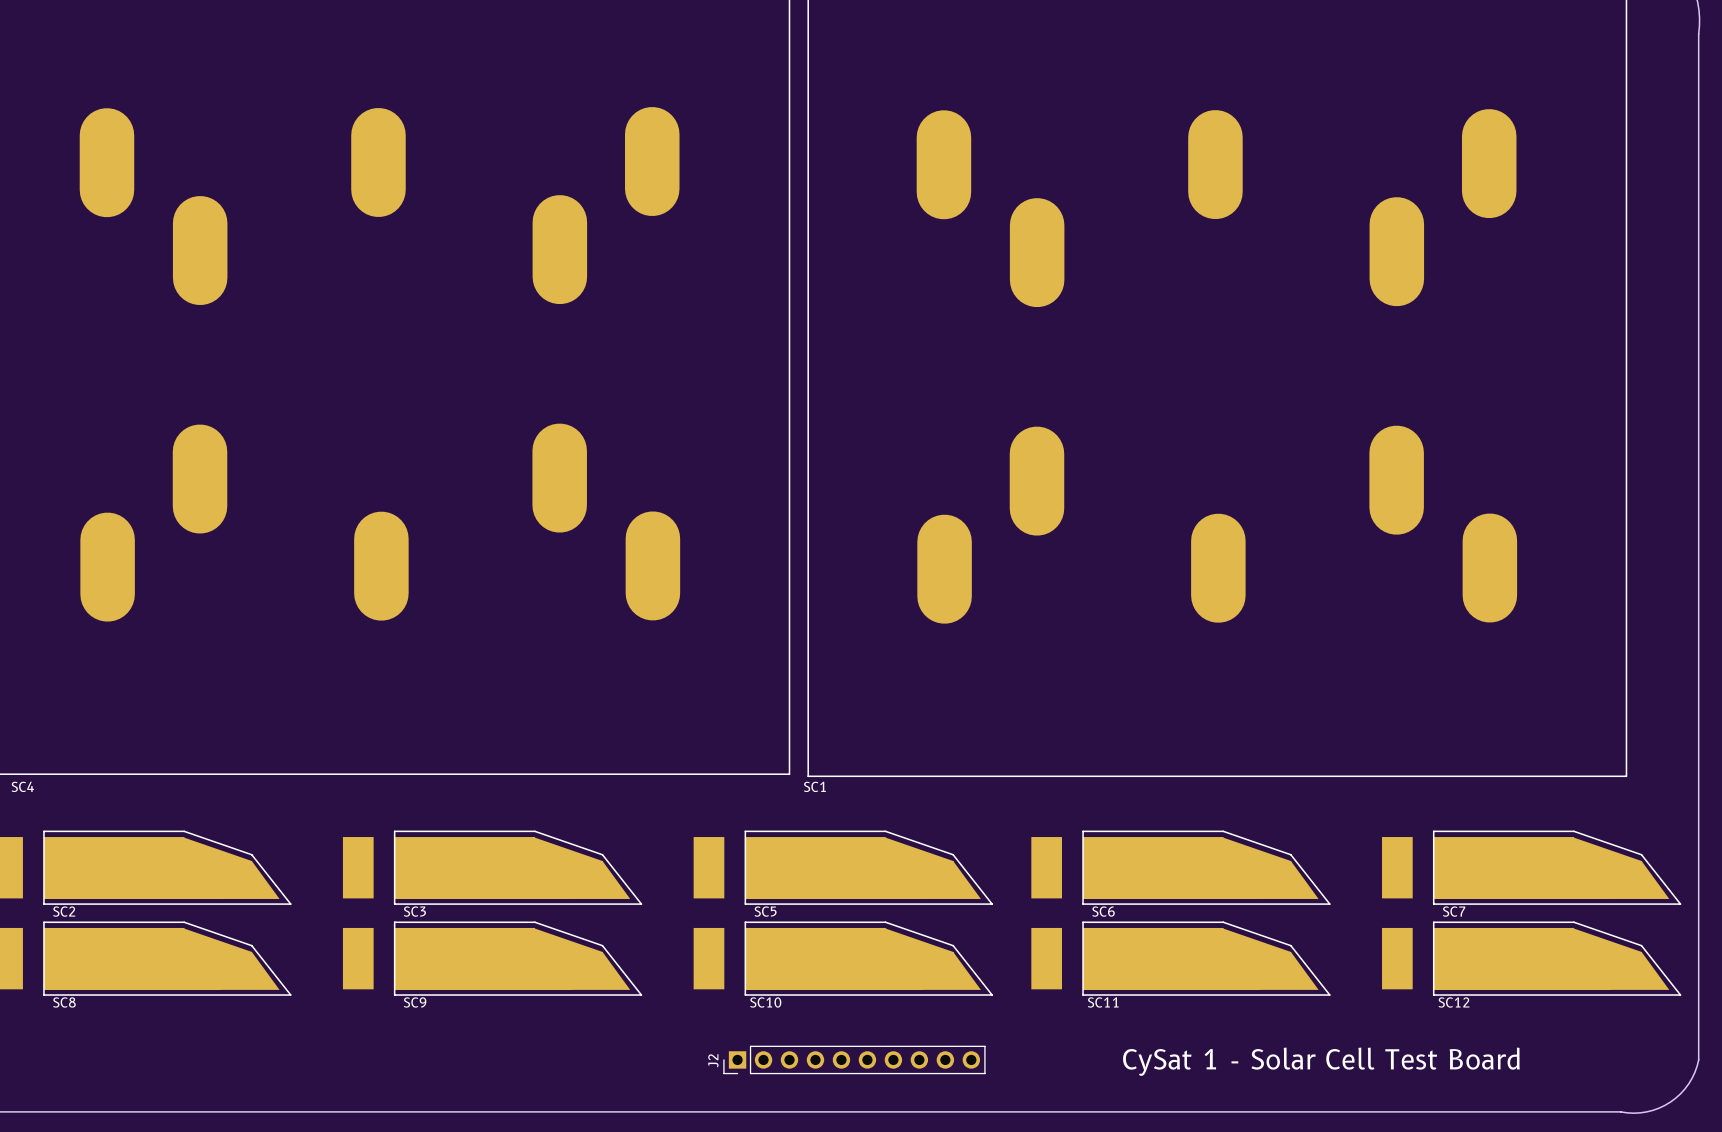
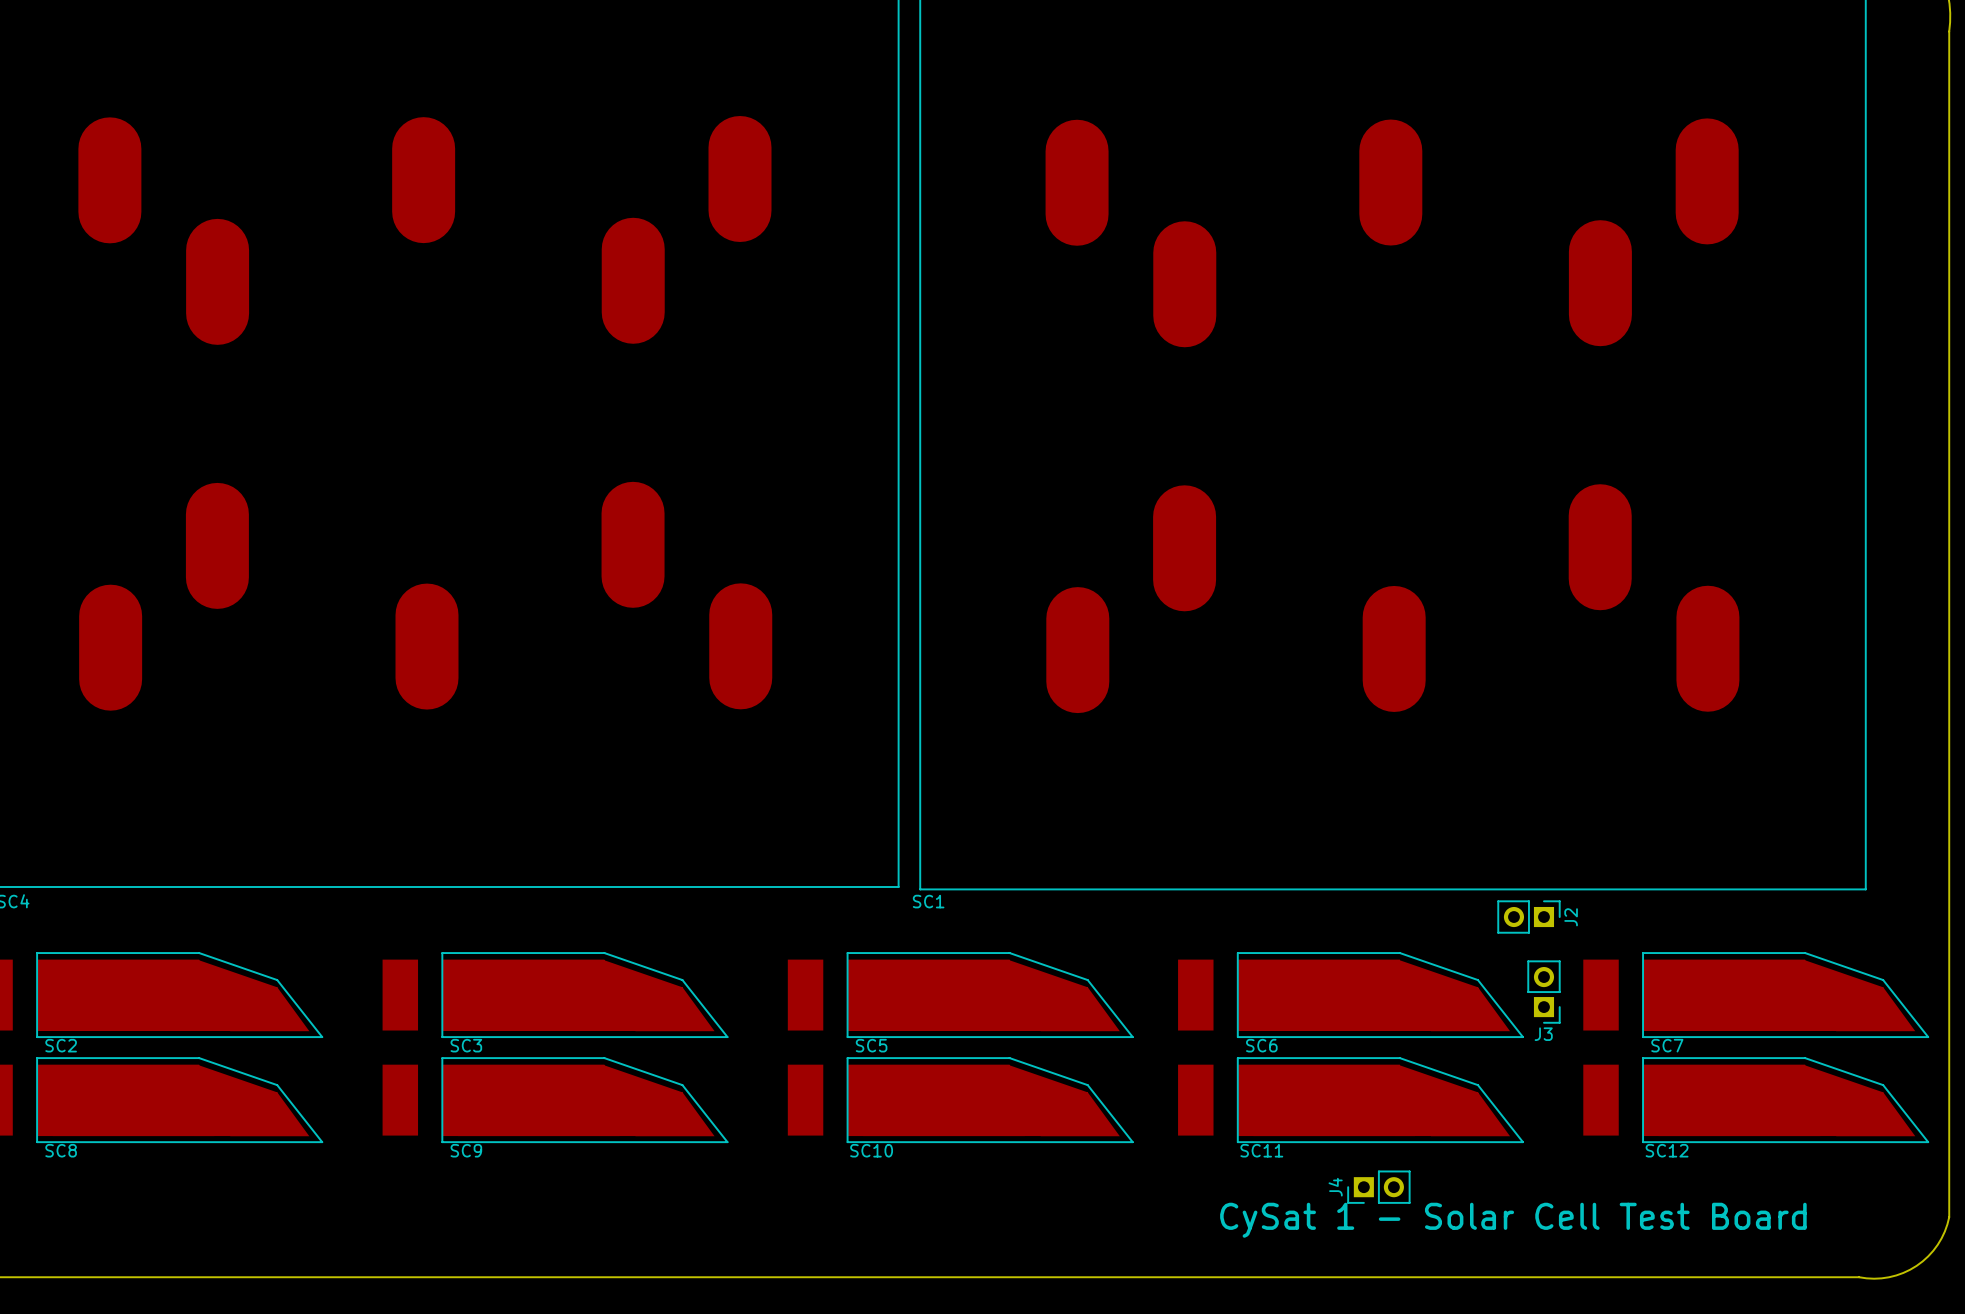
J3: none -> (1543, 992)
J4: none -> (1378, 1187)
J2 footprint: [723, 1045, 986, 1075] -> [1497, 900, 1561, 934]
J2 name position: J2 (713, 1060) -> J2 (1571, 917)

